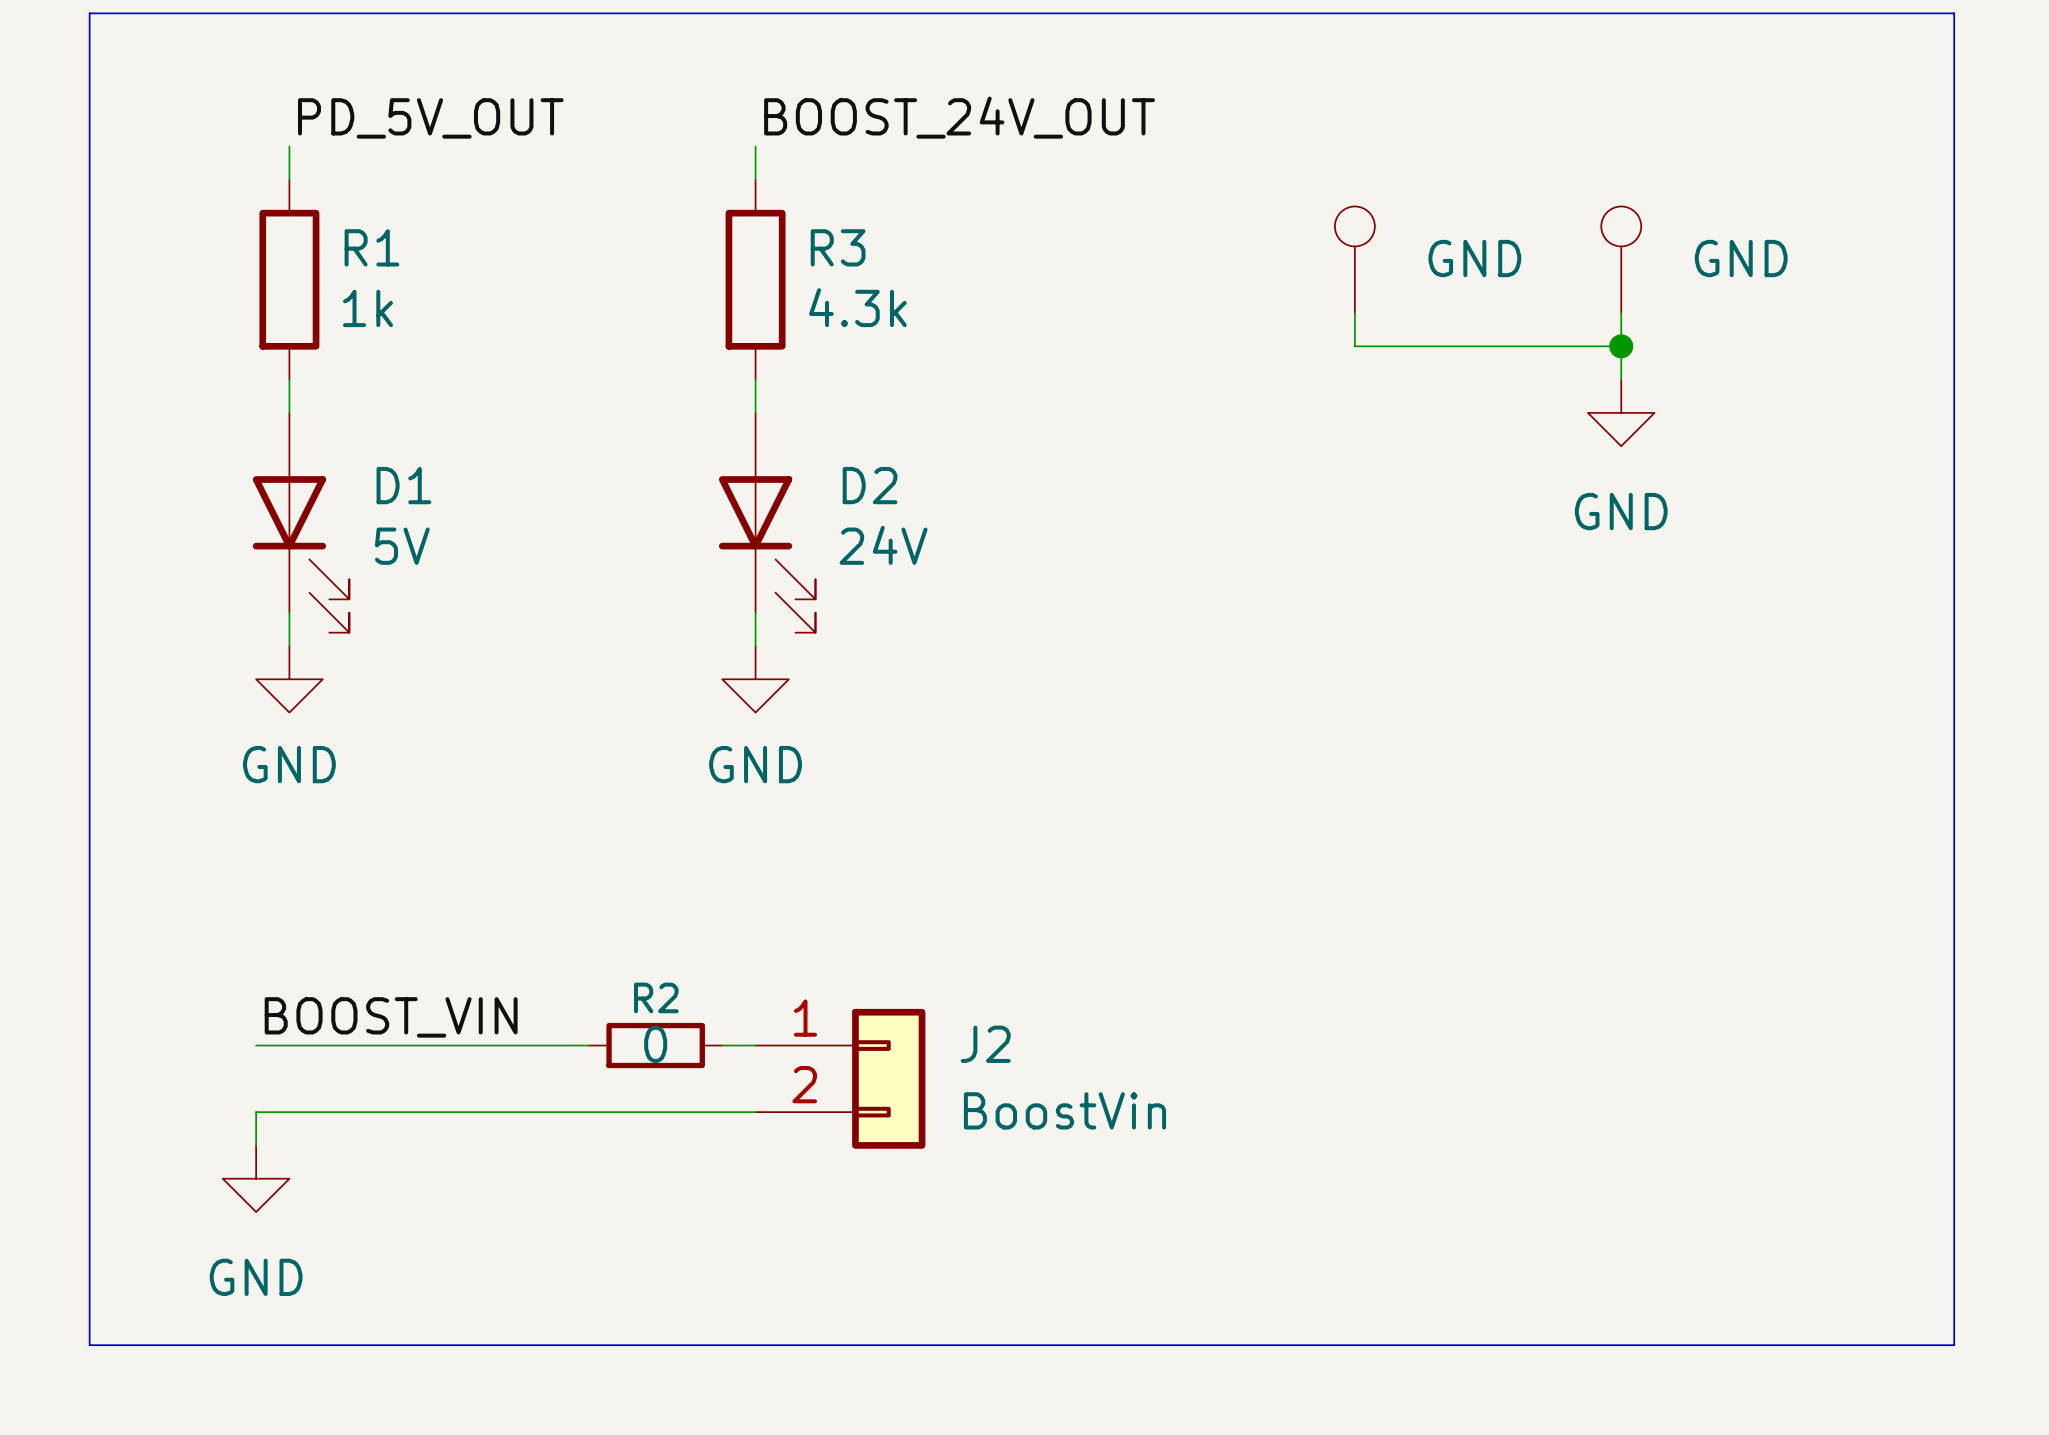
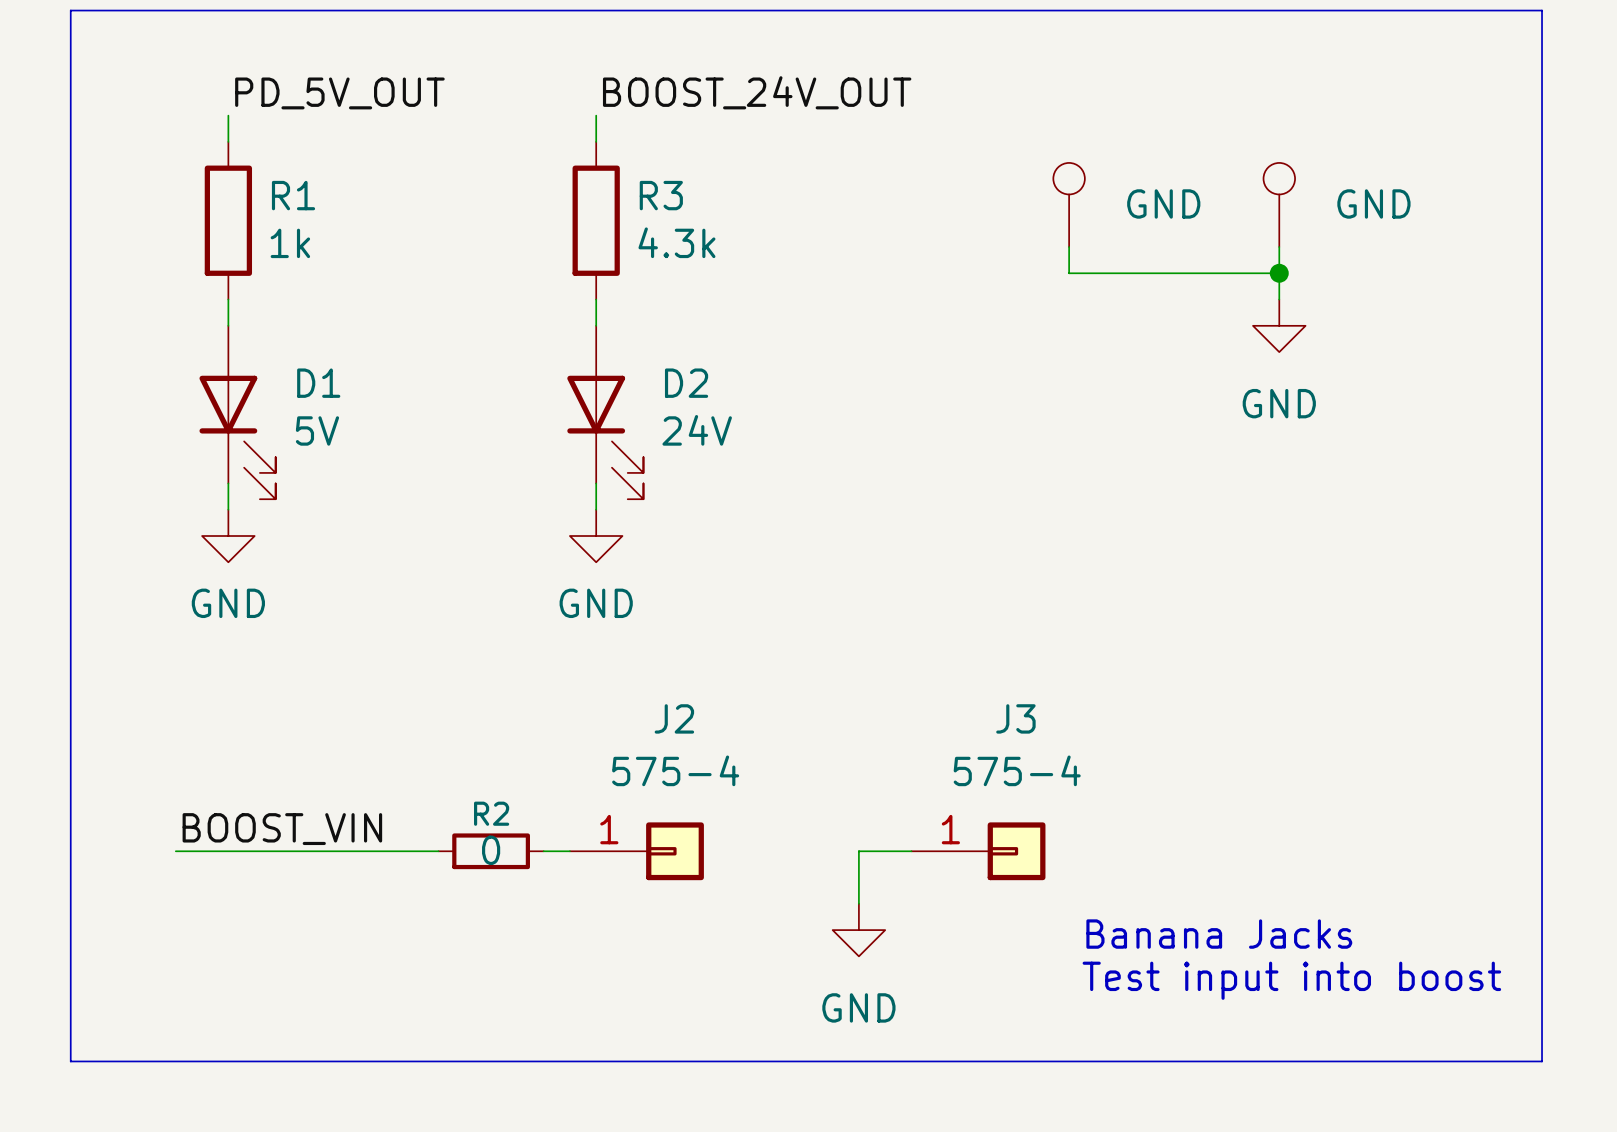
J2 symbol: [755, 1008, 926, 1149] -> [569, 822, 704, 881]
label position: BOOST_VIN (391, 1017) -> BOOST_VIN (282, 829)
J2 name position: J2 (985, 1044) -> J2 (674, 718)
wire: (256, 1045) (589, 1045) -> (175, 851) (438, 851)
R2 position: (655, 1045) -> (491, 851)
wire: (722, 1045) (755, 1045) -> (543, 851) (569, 851)
wire: none -> (911, 851) (858, 851) (858, 903)
J3: none -> 575-4 (978, 851)
J2 value: BoostVin (1064, 1110) -> 575-4 (675, 770)
wire: (755, 1112) (256, 1112) (256, 1145) -> none
power symbol: GND (256, 1178) -> none
power symbol: none -> GND (858, 930)
text: none -> Banana Jacks (1219, 934)
text: none -> Test input into boost (1291, 980)

